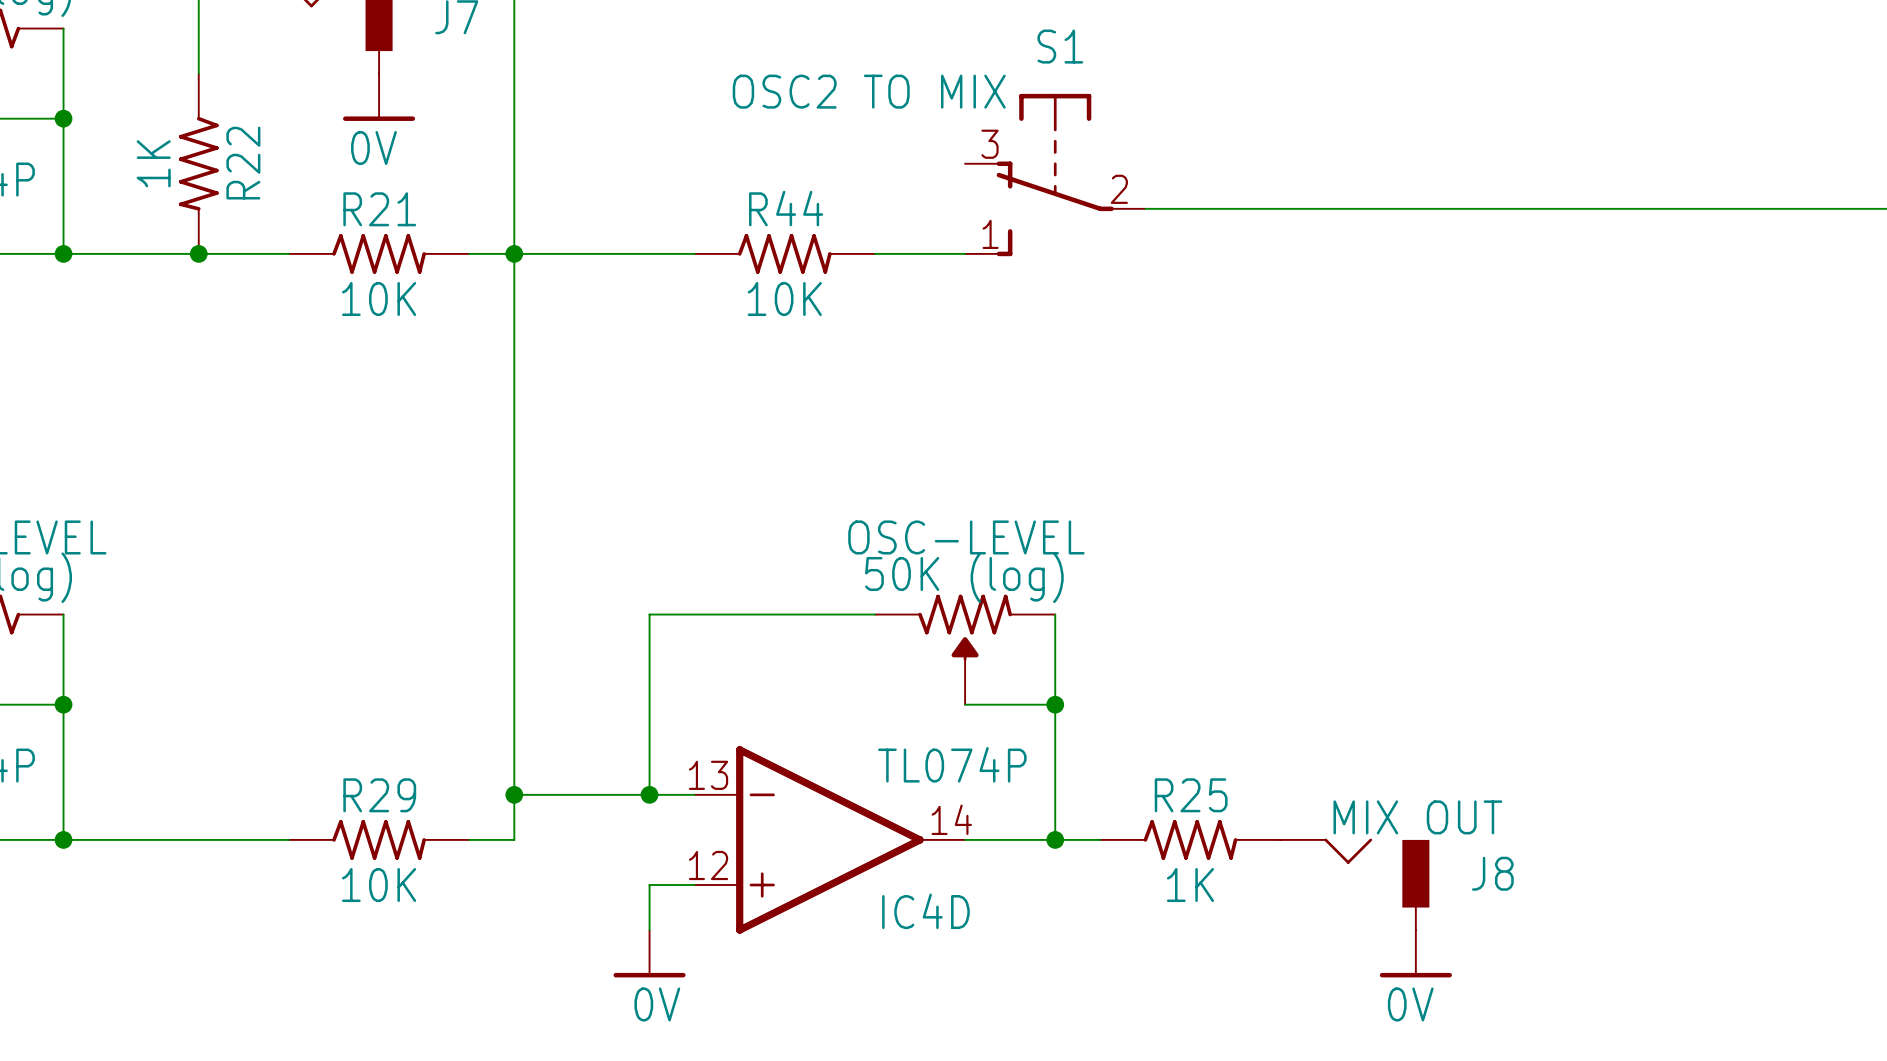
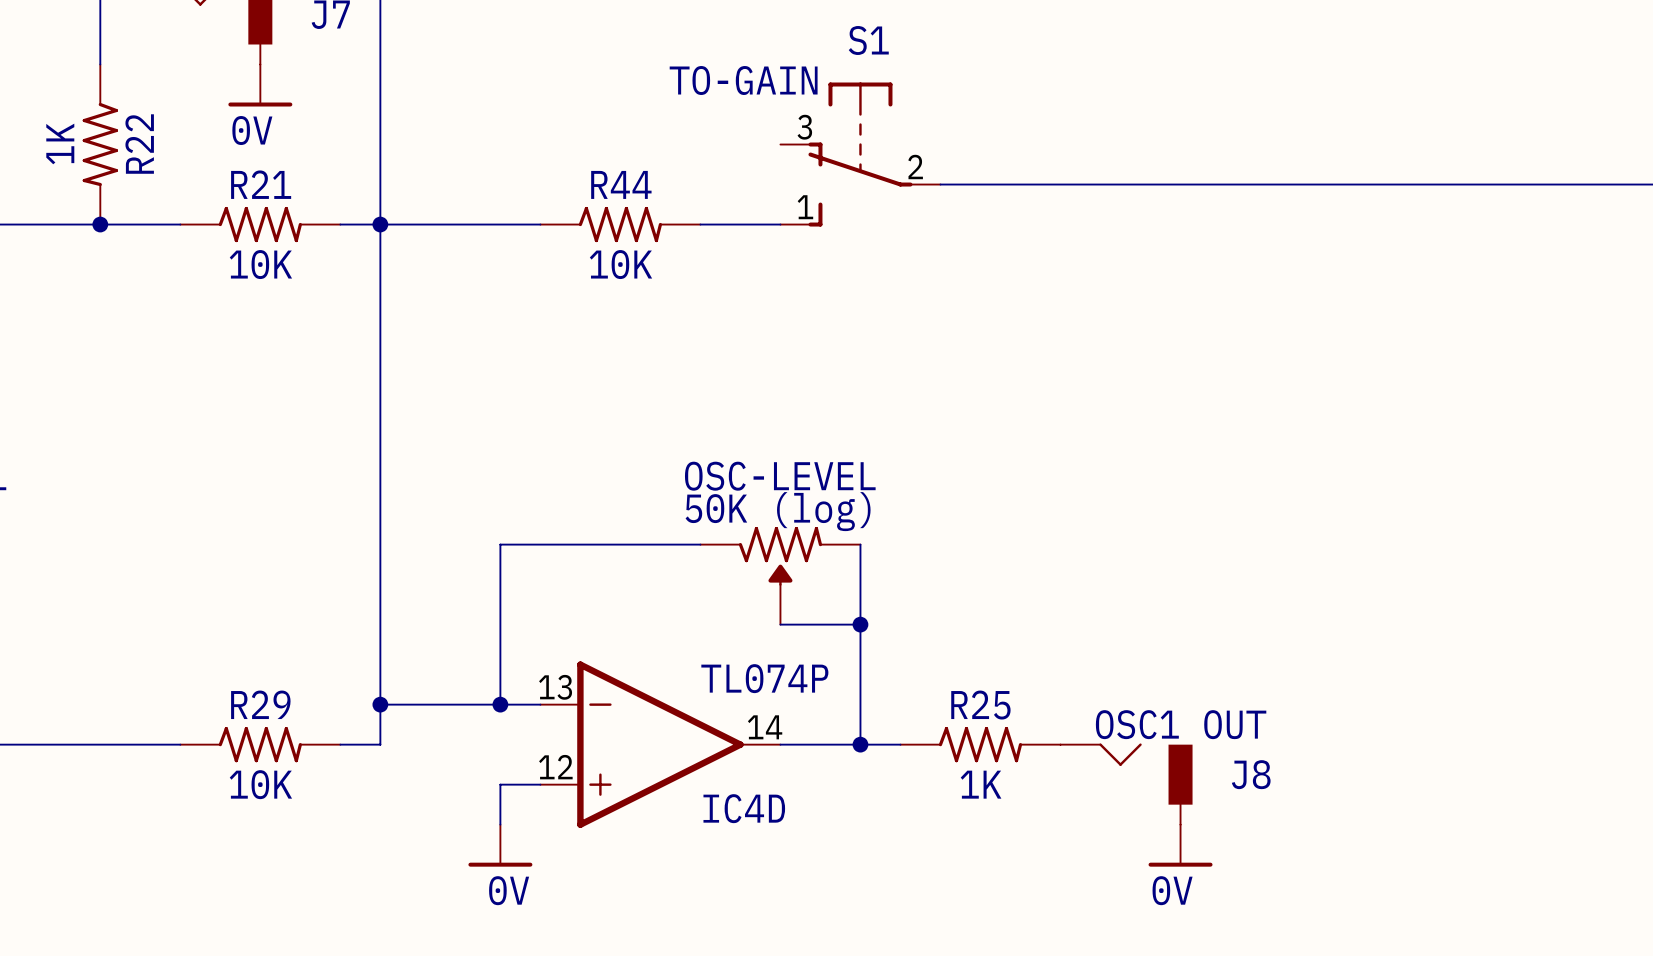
S1 value: OSC2 TO MIX (869, 91) -> TO-GAIN (743, 80)
J8 value: MIX OUT (1417, 817) -> OSC1 OUT (1181, 724)

